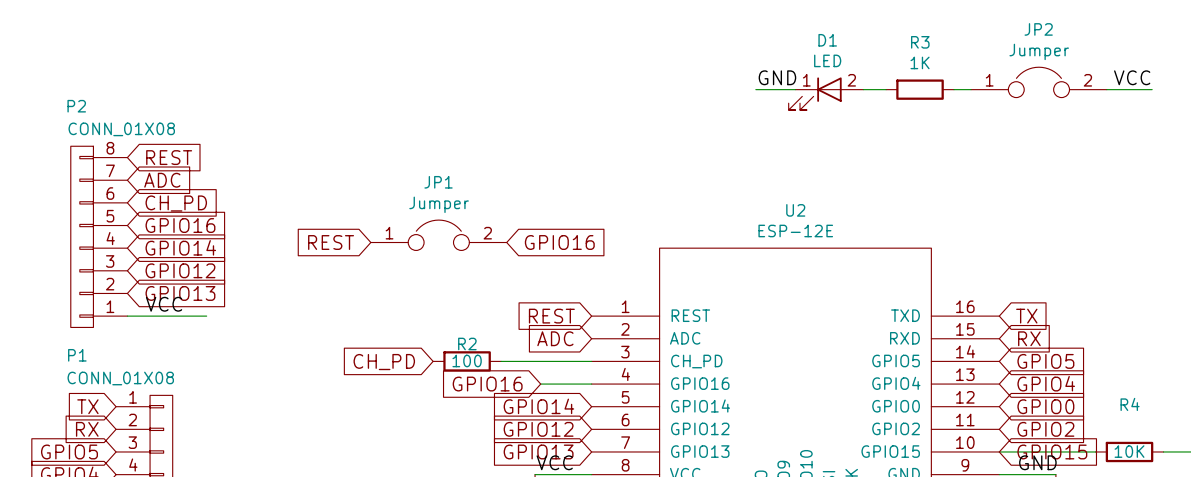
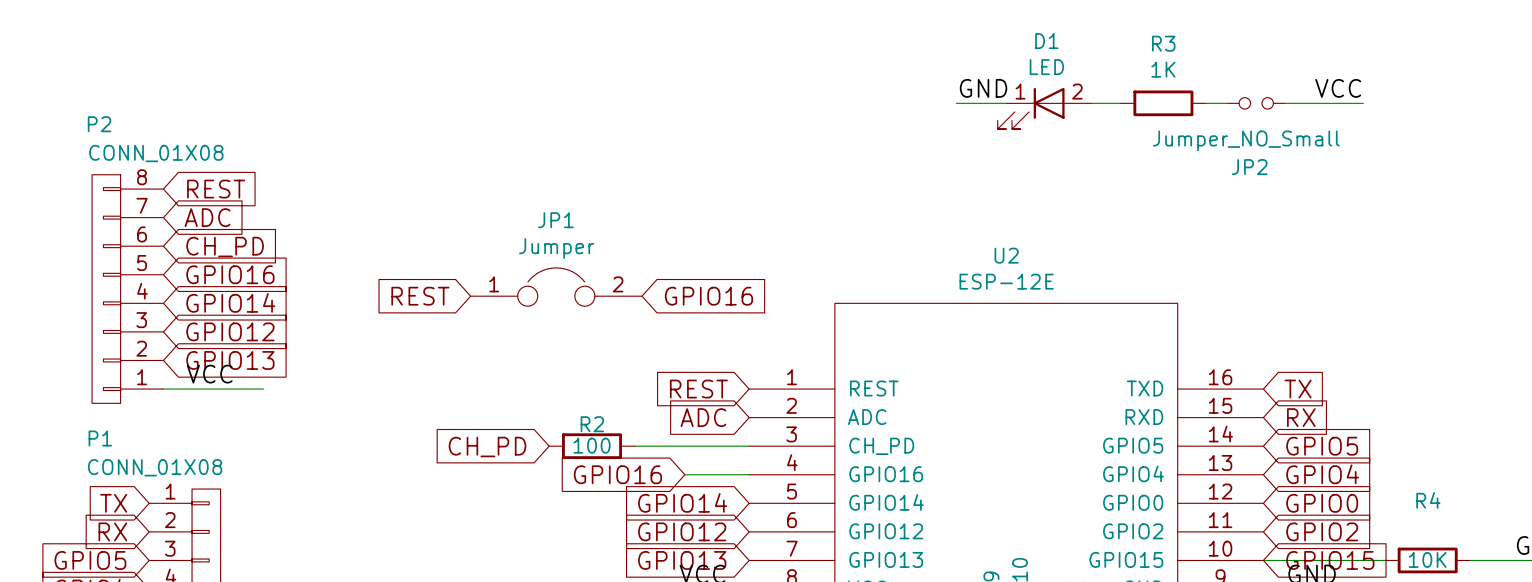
JP2 name position: JP2 (1038, 29) -> JP2 (1249, 167)
JP2 value: Jumper (1039, 51) -> Jumper_NO_Small (1246, 140)
JP2 symbol: [970, 67, 1107, 98] -> [1227, 97, 1285, 110]
label position: VCC (1132, 77) -> VCC (1338, 88)
wire: none -> (1284, 103) (1363, 103)
wire: (1106, 89) (1152, 89) -> none

